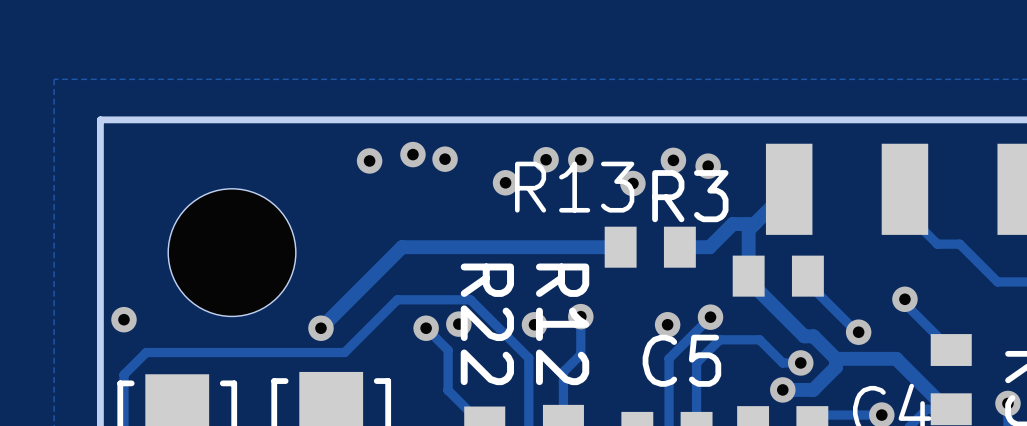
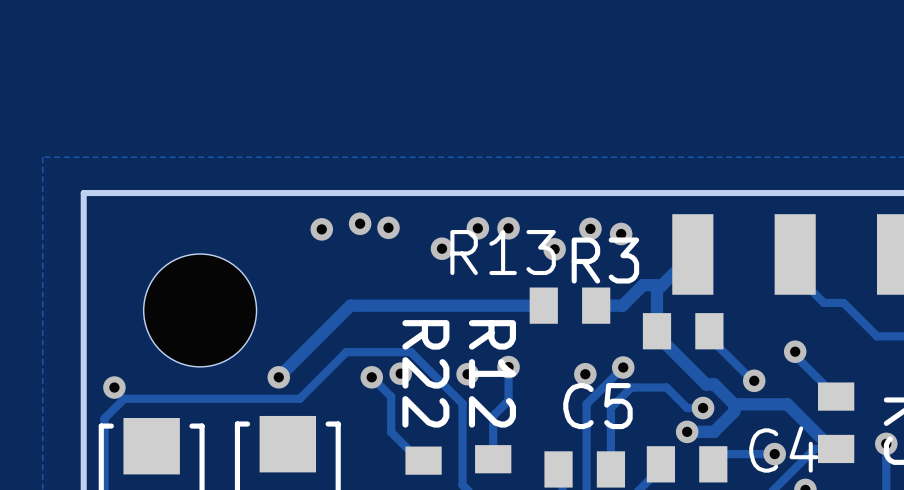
via position: (123, 319) -> (114, 387)

